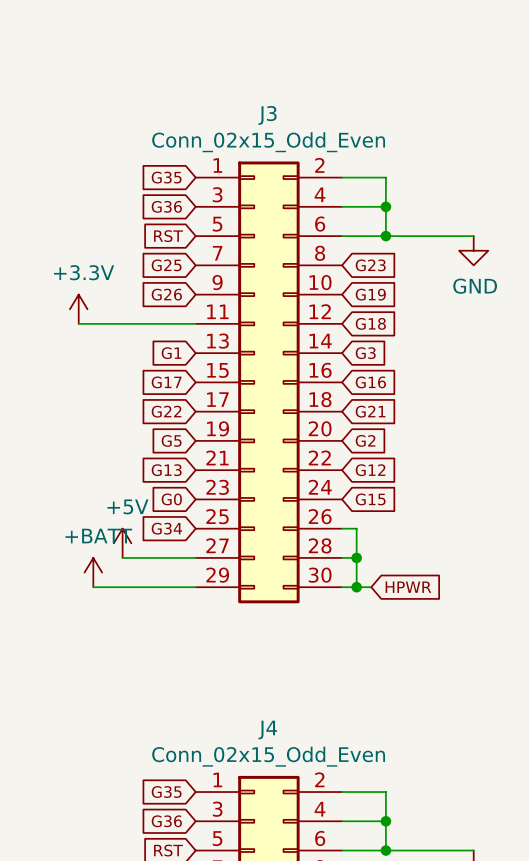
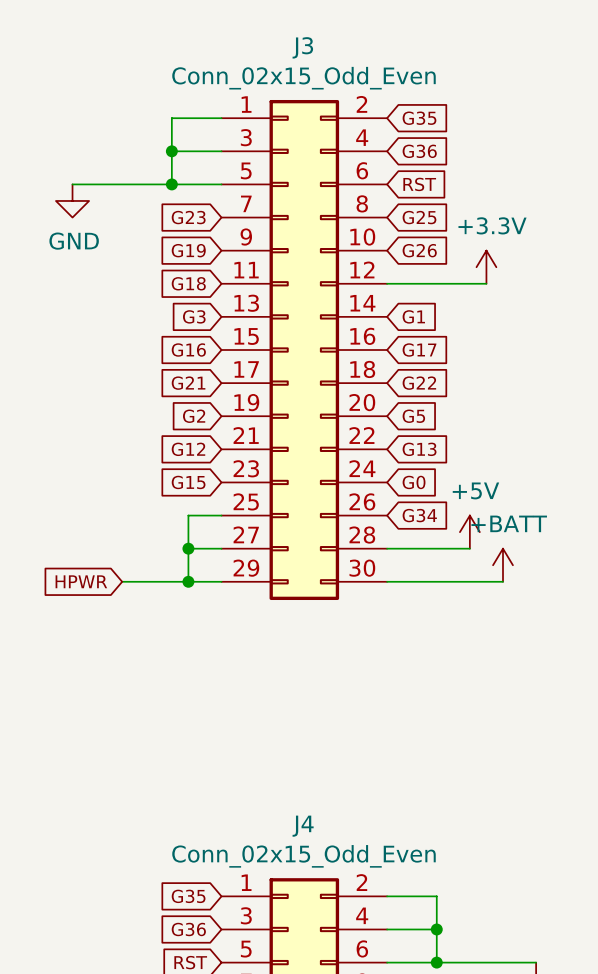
wire: none -> (221, 118) (171, 118) (171, 184)
junction: none -> (171, 151)
junction: none -> (171, 184)
power symbol: none -> GND (72, 200)
global label rotation: 0° (166, 177) -> 180° (419, 118)
global label position: G35 (166, 177) -> G35 (419, 118)
wire: (342, 177) (385, 177) (385, 236) -> none
global label rotation: 0° (166, 206) -> 180° (419, 151)
global label position: G36 (166, 206) -> G36 (419, 151)
wire: (342, 206) (385, 206) -> (171, 151) (221, 151)
junction: (385, 206) -> none
global label rotation: 0° (168, 236) -> 180° (419, 184)
global label position: RST (168, 236) -> RST (419, 184)
wire: (342, 236) (473, 236) -> (72, 184) (221, 184)
junction: (385, 236) -> none
power symbol: none -> +3.3V (486, 267)
wire: none -> (387, 283) (486, 283)
power symbol: GND (473, 250) -> none
global label rotation: 0° (166, 265) -> 180° (419, 217)
global label position: G25 (166, 265) -> G25 (419, 217)
global label rotation: 0° (370, 265) -> 180° (188, 217)
global label position: G23 (370, 265) -> G23 (188, 217)
global label rotation: 0° (166, 294) -> 180° (419, 250)
global label position: G26 (166, 294) -> G26 (419, 250)
global label rotation: 0° (370, 294) -> 180° (188, 250)
global label position: G19 (370, 294) -> G19 (188, 250)
power symbol: +3.3V (78, 309) -> none
wire: (78, 323) (195, 323) -> none
global label rotation: 0° (370, 323) -> 180° (188, 283)
global label position: G18 (370, 323) -> G18 (188, 283)
global label rotation: 0° (171, 353) -> 180° (413, 316)
global label position: G1 (171, 353) -> G1 (413, 316)
global label rotation: 0° (365, 353) -> 180° (194, 316)
global label position: G3 (365, 353) -> G3 (194, 316)
global label rotation: 0° (166, 382) -> 180° (419, 350)
global label position: G17 (166, 382) -> G17 (419, 350)
J3 position: (268, 382) -> (304, 350)
global label rotation: 0° (370, 382) -> 180° (188, 350)
global label position: G16 (370, 382) -> G16 (188, 350)
global label rotation: 0° (166, 411) -> 180° (419, 383)
global label position: G22 (166, 411) -> G22 (419, 383)
global label rotation: 0° (370, 411) -> 180° (188, 383)
global label position: G21 (370, 411) -> G21 (188, 383)
global label rotation: 0° (171, 440) -> 180° (413, 416)
global label position: G5 (171, 440) -> G5 (413, 416)
global label rotation: 0° (365, 440) -> 180° (194, 416)
global label position: G2 (365, 440) -> G2 (194, 416)
wire: none -> (221, 515) (188, 515) (188, 581)
global label rotation: 0° (166, 470) -> 180° (419, 449)
global label position: G13 (166, 470) -> G13 (419, 449)
global label rotation: 0° (370, 470) -> 180° (188, 449)
global label position: G12 (370, 470) -> G12 (188, 449)
power symbol: none -> +5V (469, 532)
junction: none -> (188, 548)
global label rotation: 0° (171, 499) -> 180° (414, 482)
global label position: G0 (171, 499) -> G0 (414, 482)
global label rotation: 0° (370, 499) -> 180° (188, 482)
global label position: G15 (370, 499) -> G15 (188, 482)
power symbol: none -> +BATT (503, 565)
wire: none -> (122, 581) (221, 581)
junction: none -> (188, 581)
global label rotation: 0° (166, 528) -> 180° (419, 515)
global label position: G34 (166, 528) -> G34 (419, 515)
wire: (342, 528) (356, 528) (356, 587) -> none
power symbol: +5V (122, 543) -> none
wire: (122, 557) (195, 557) -> (387, 548) (469, 548)
wire: (342, 557) (356, 557) -> none
junction: (356, 557) -> none
power symbol: +BATT (93, 572) -> none
wire: (93, 587) (195, 587) -> (387, 581) (503, 581)
wire: (342, 587) (371, 587) -> (188, 548) (221, 548)
junction: (356, 587) -> none
global label rotation: 0° (408, 587) -> 180° (81, 581)
global label position: HPWR (408, 587) -> HPWR (81, 581)

